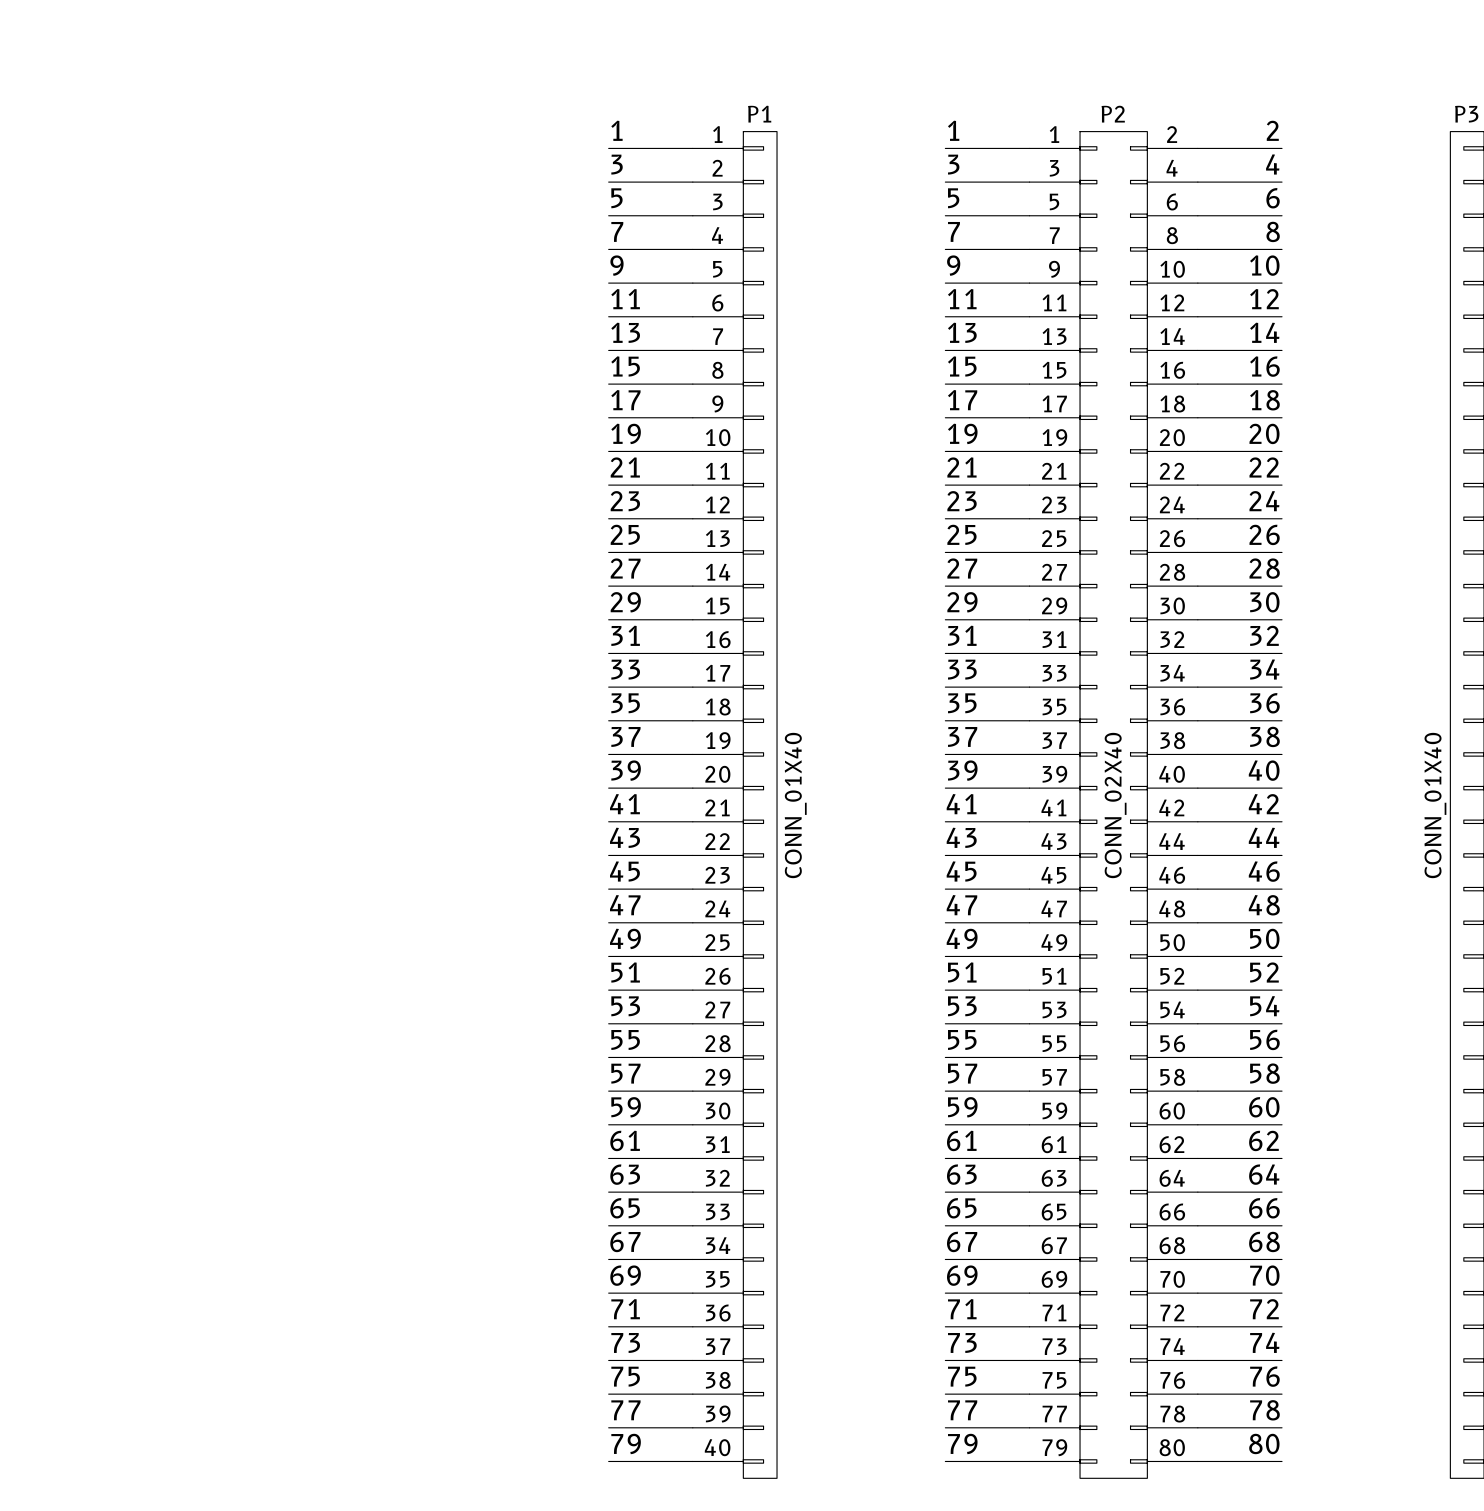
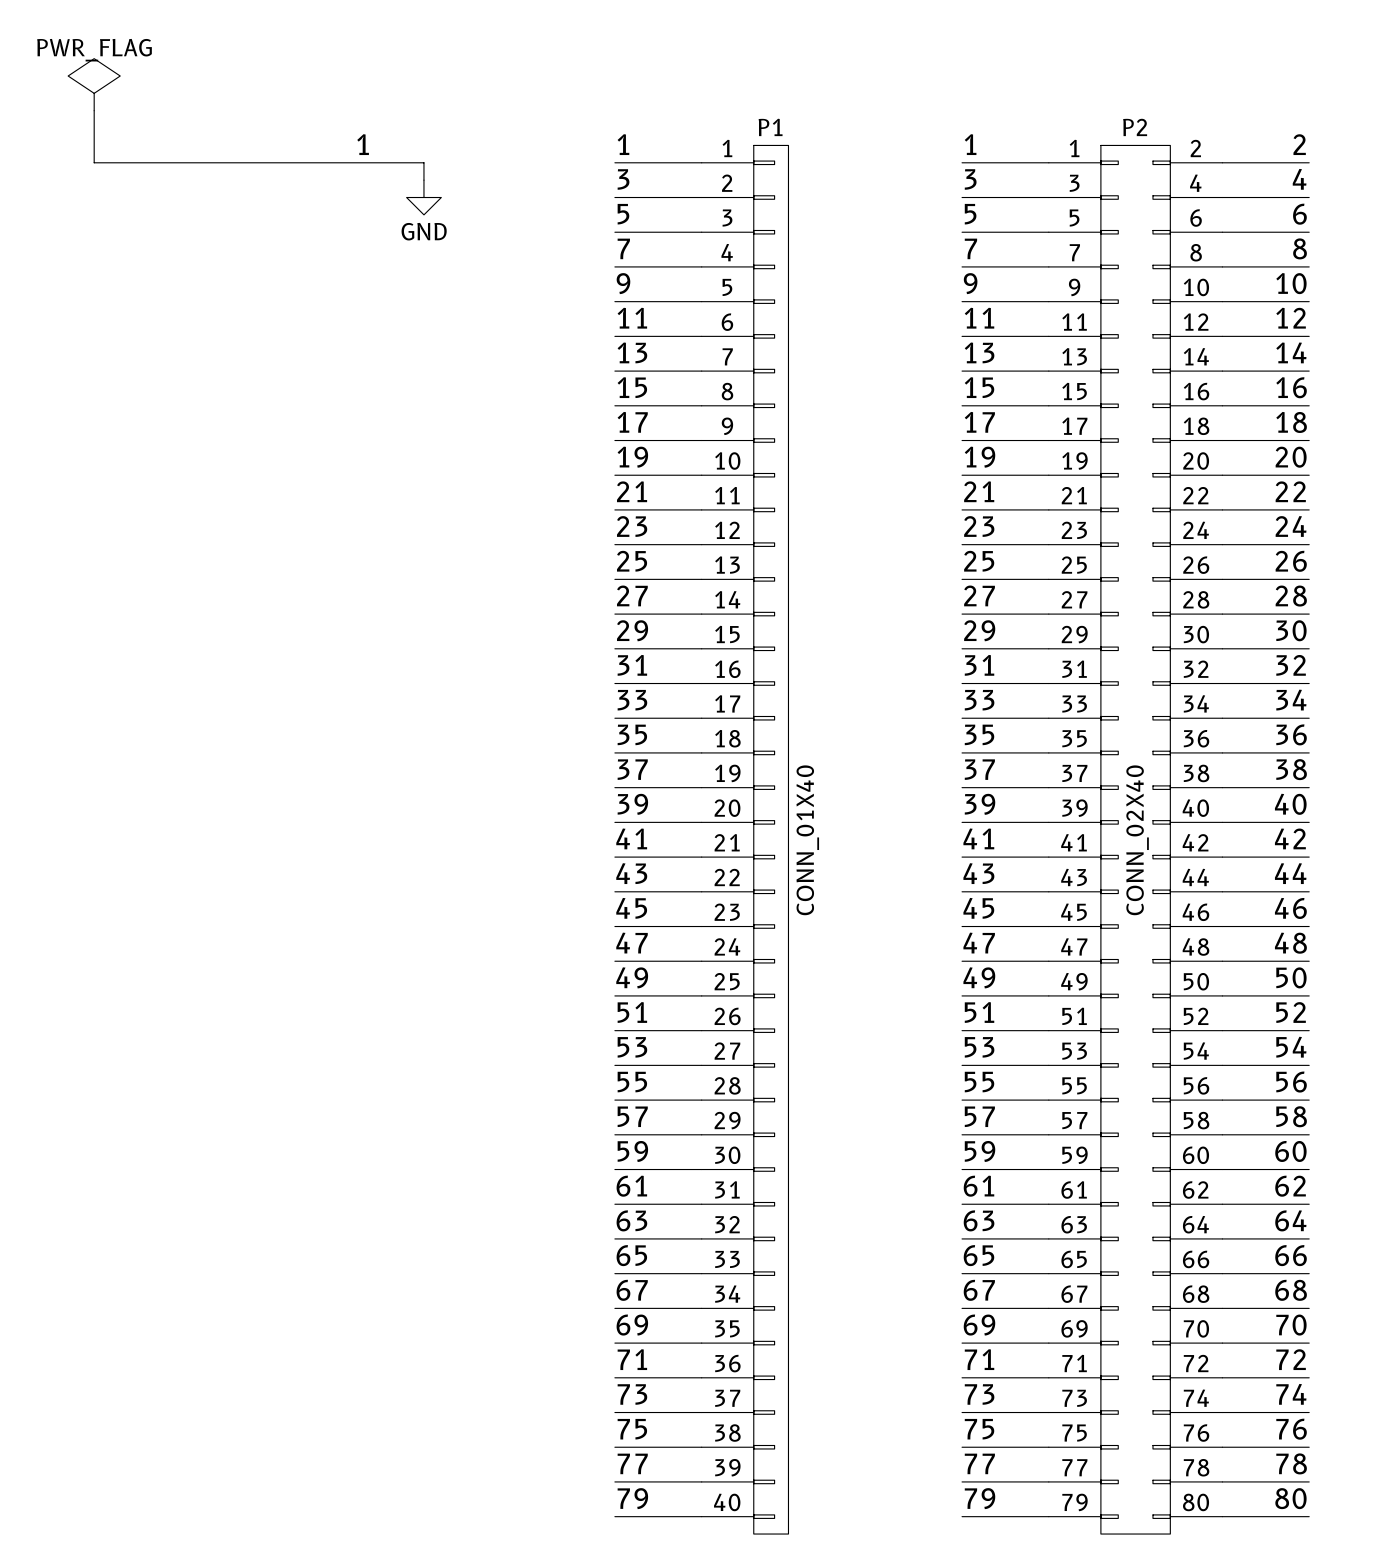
power symbol: none -> PWR_FLAG (94, 84)
wire: none -> (94, 110) (94, 162) (423, 162) (423, 180)
label: none -> 1 (363, 144)
power symbol: none -> GND (423, 197)

